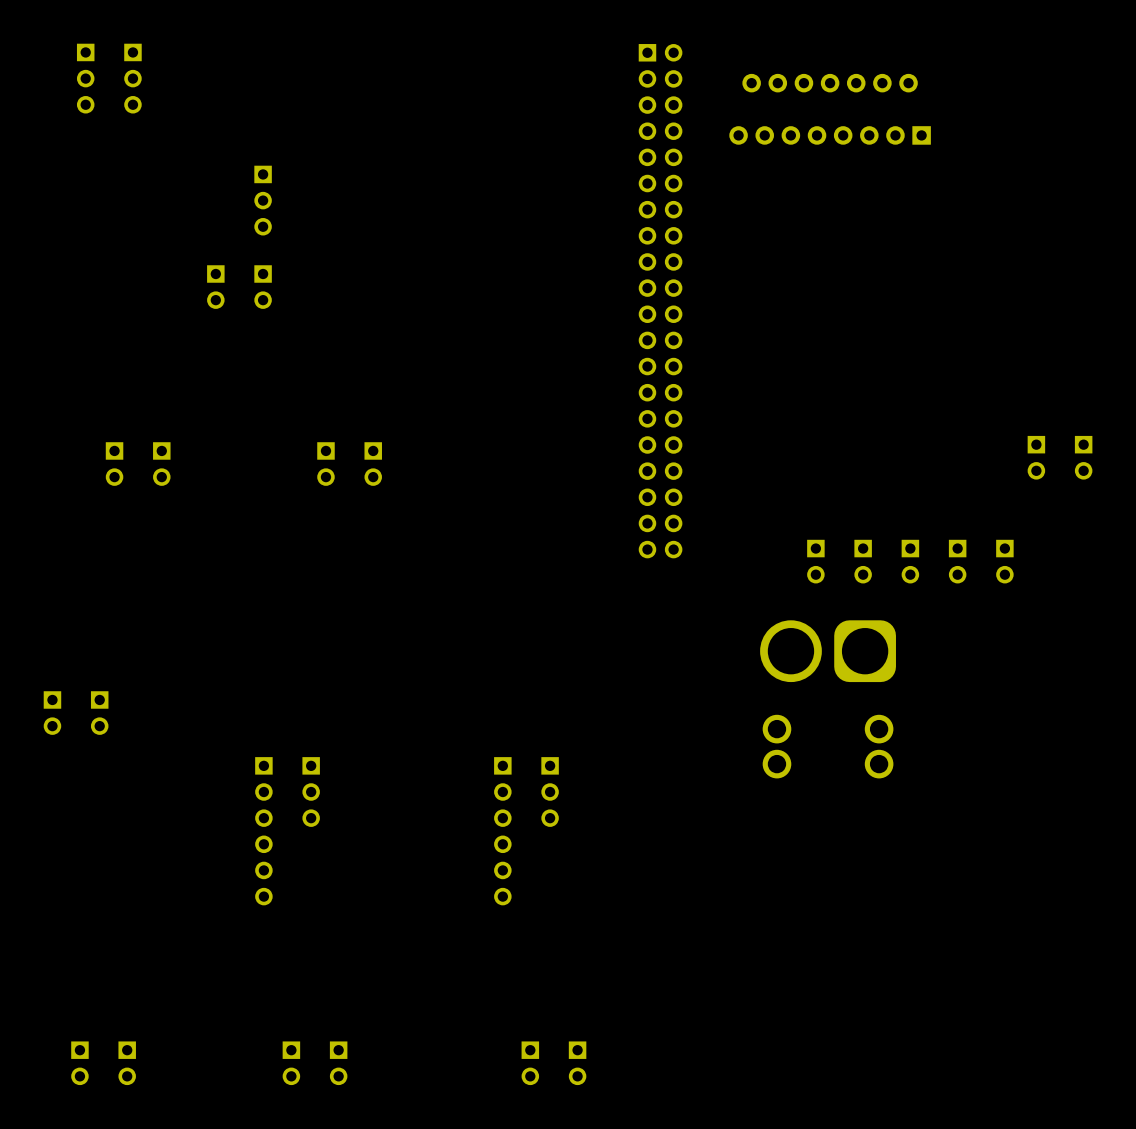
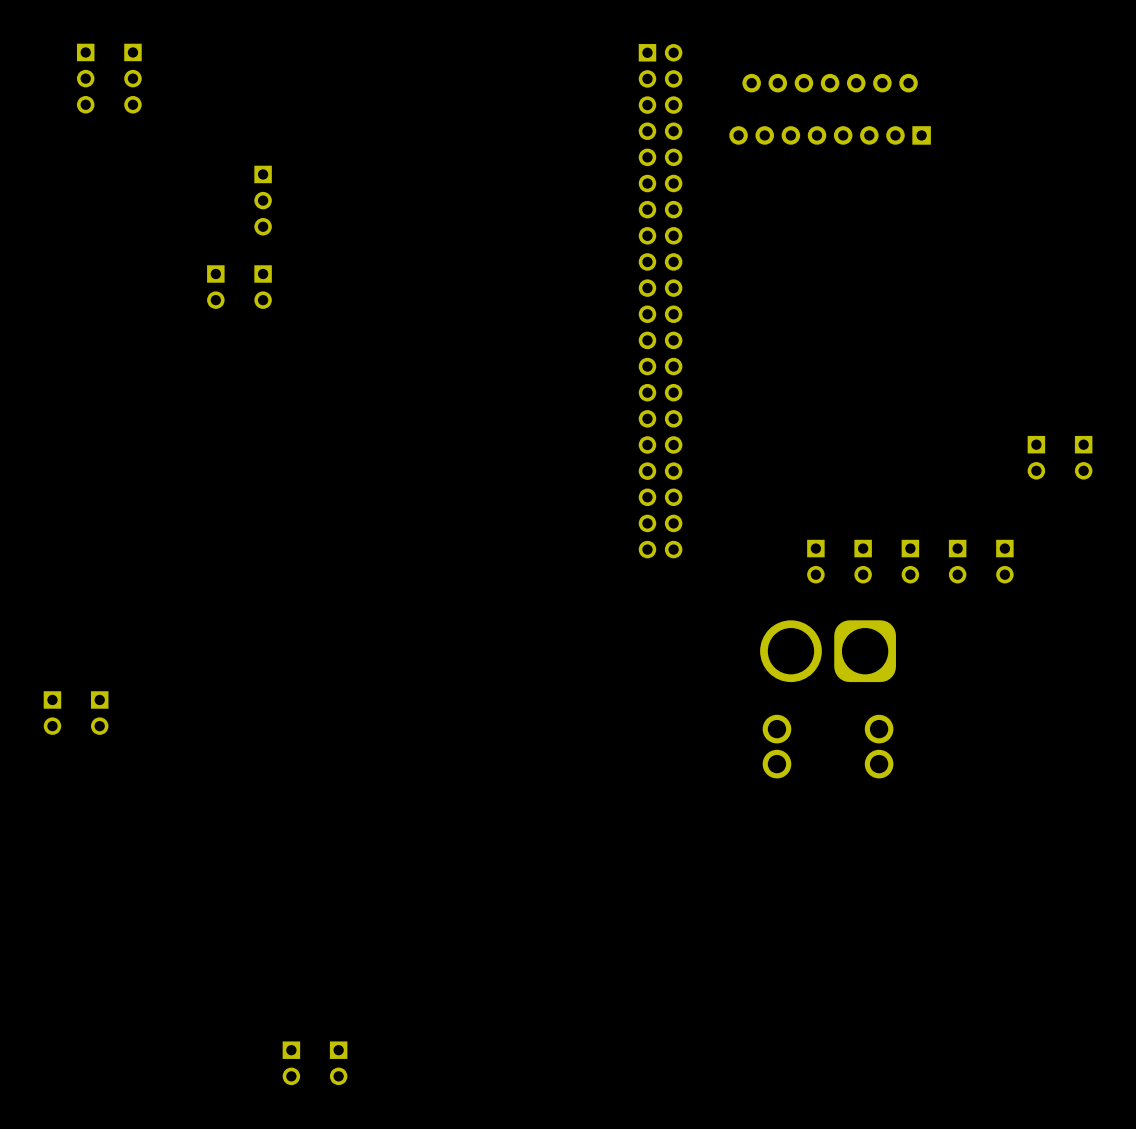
part: (114, 464) -> none
part: (161, 464) -> none
part: (325, 464) -> none
part: (373, 464) -> none
part: (311, 792) -> none
part: (550, 792) -> none
part: (263, 831) -> none
part: (502, 831) -> none
part: (79, 1063) -> none
part: (127, 1063) -> none
part: (530, 1063) -> none
part: (577, 1063) -> none

